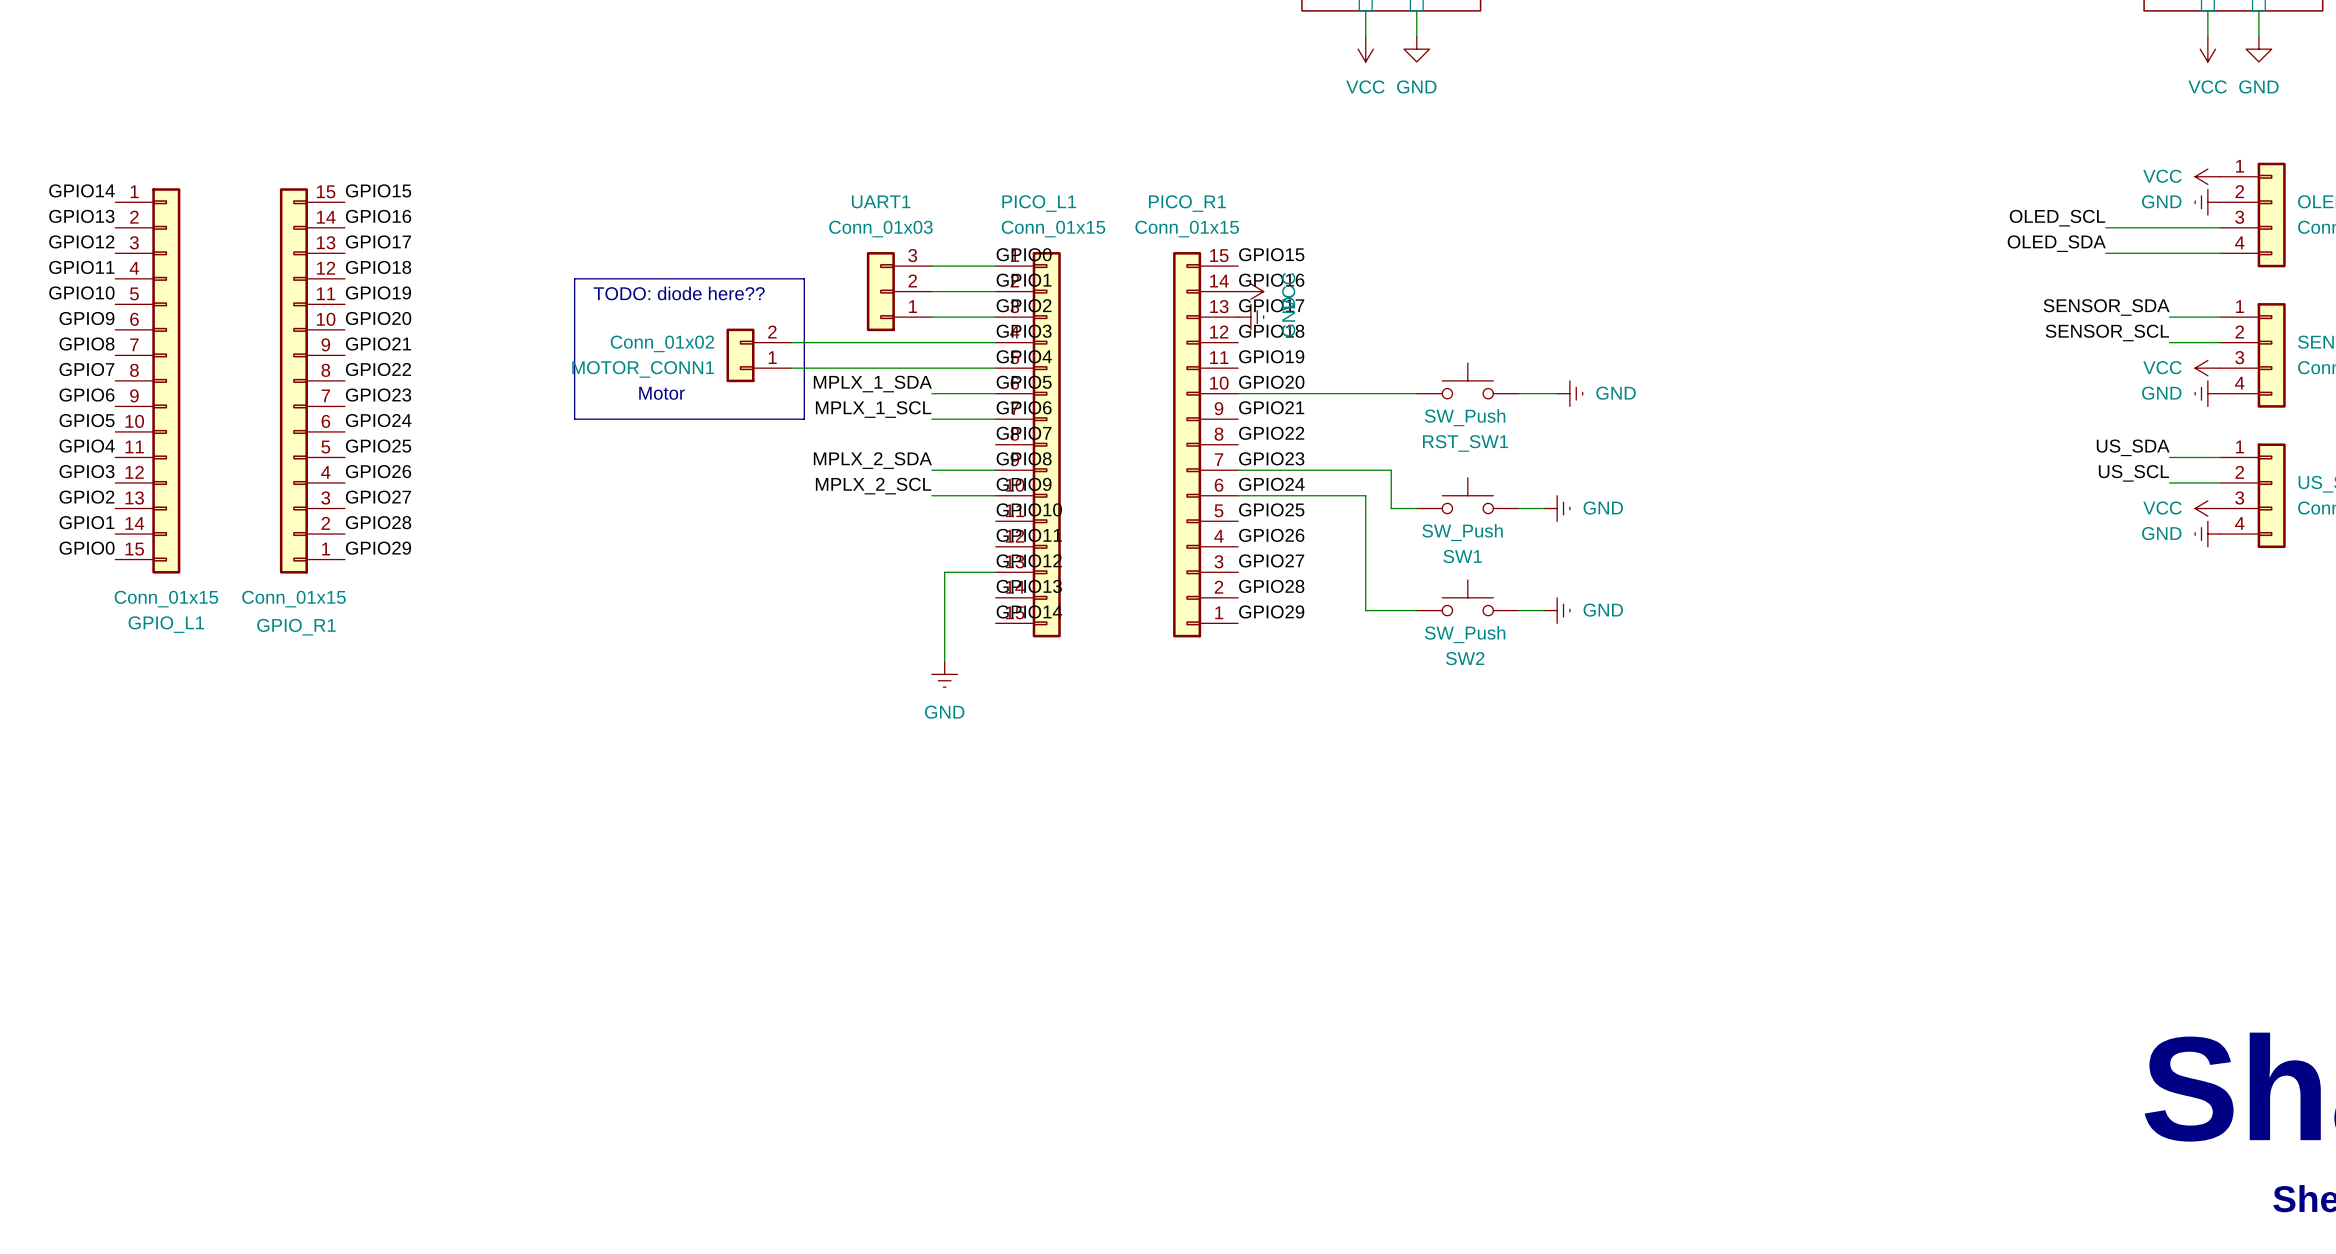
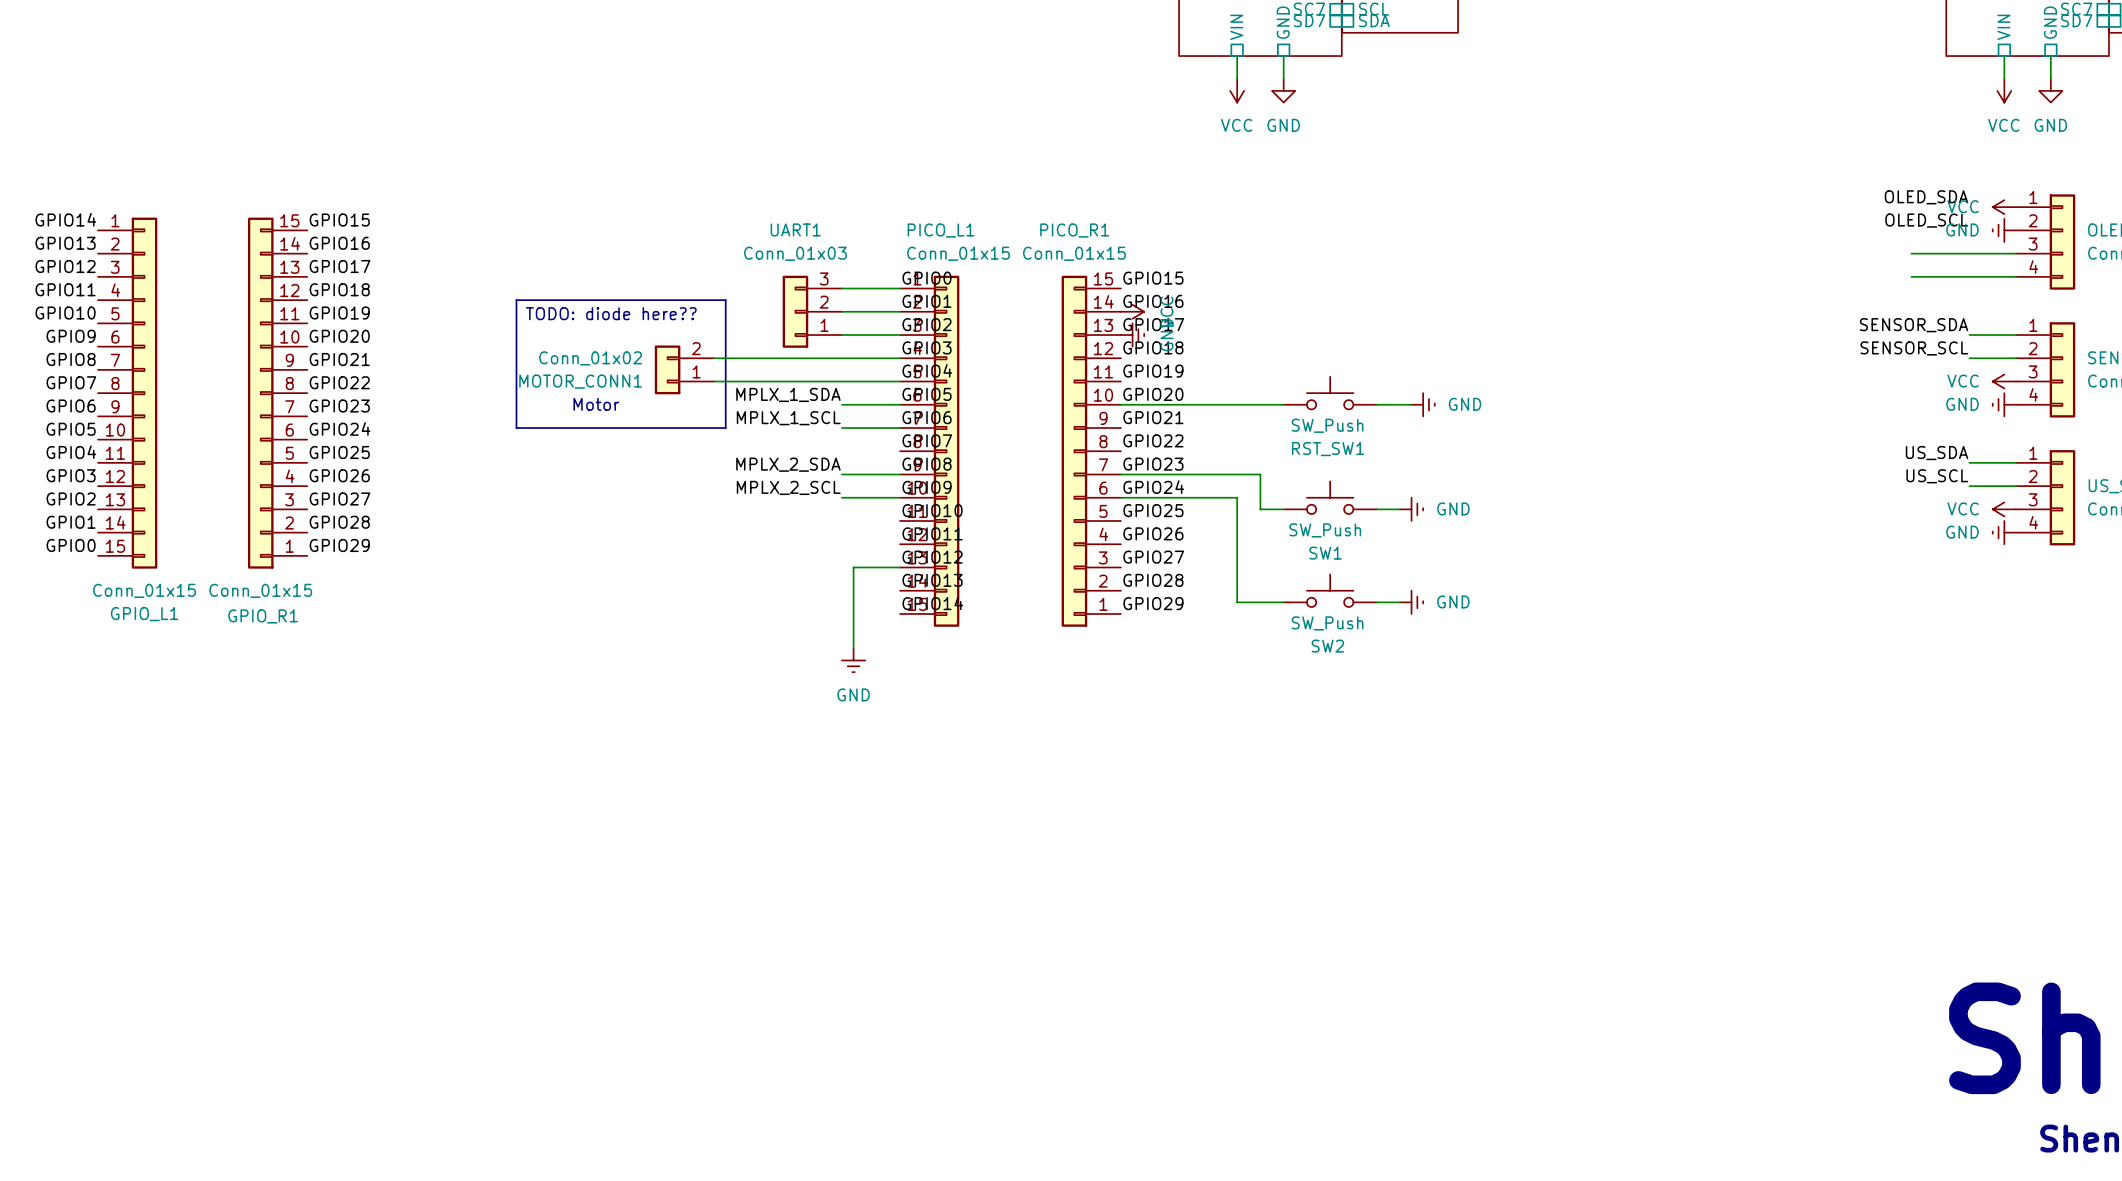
label position: OLED_SCL (2057, 218) -> OLED_SCL (1926, 220)
label position: OLED_SDA (2056, 243) -> OLED_SDA (1926, 197)

